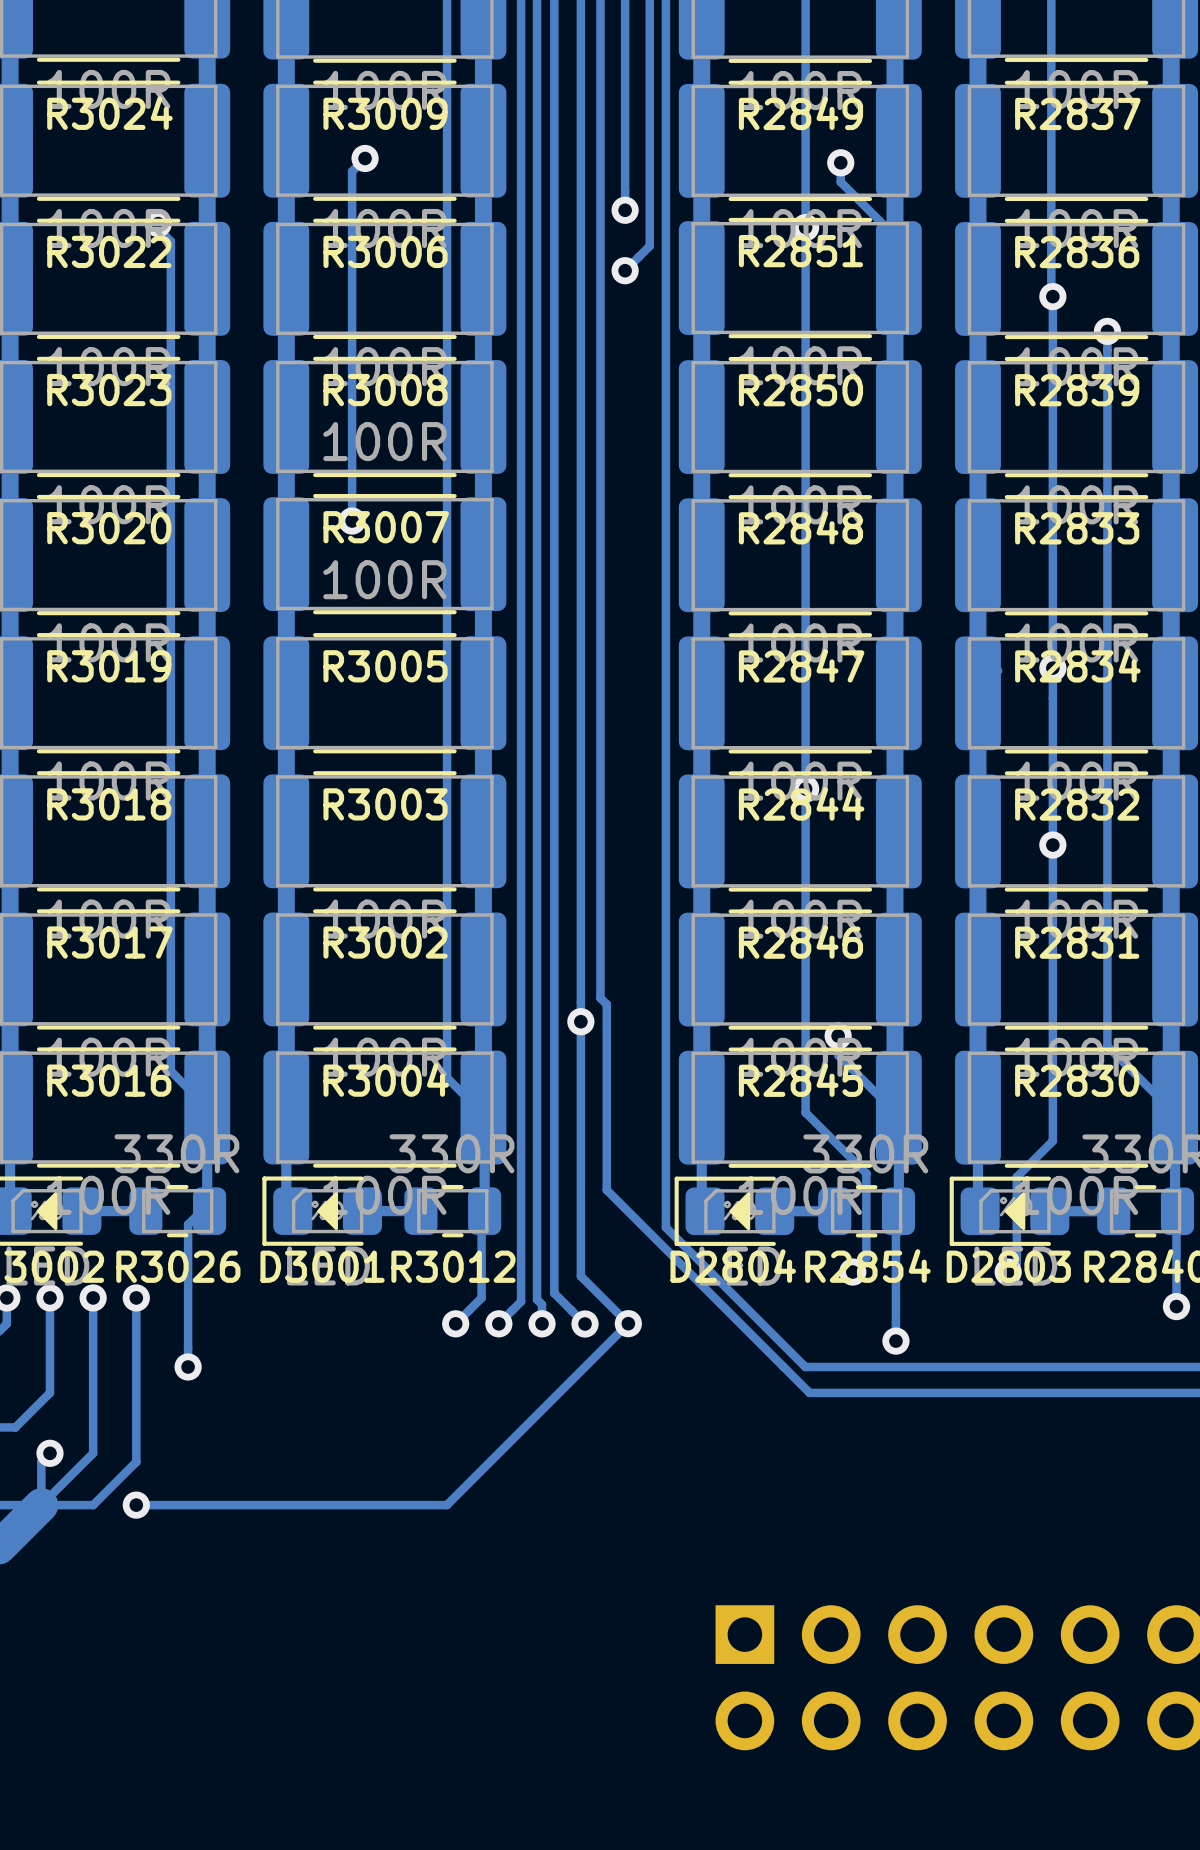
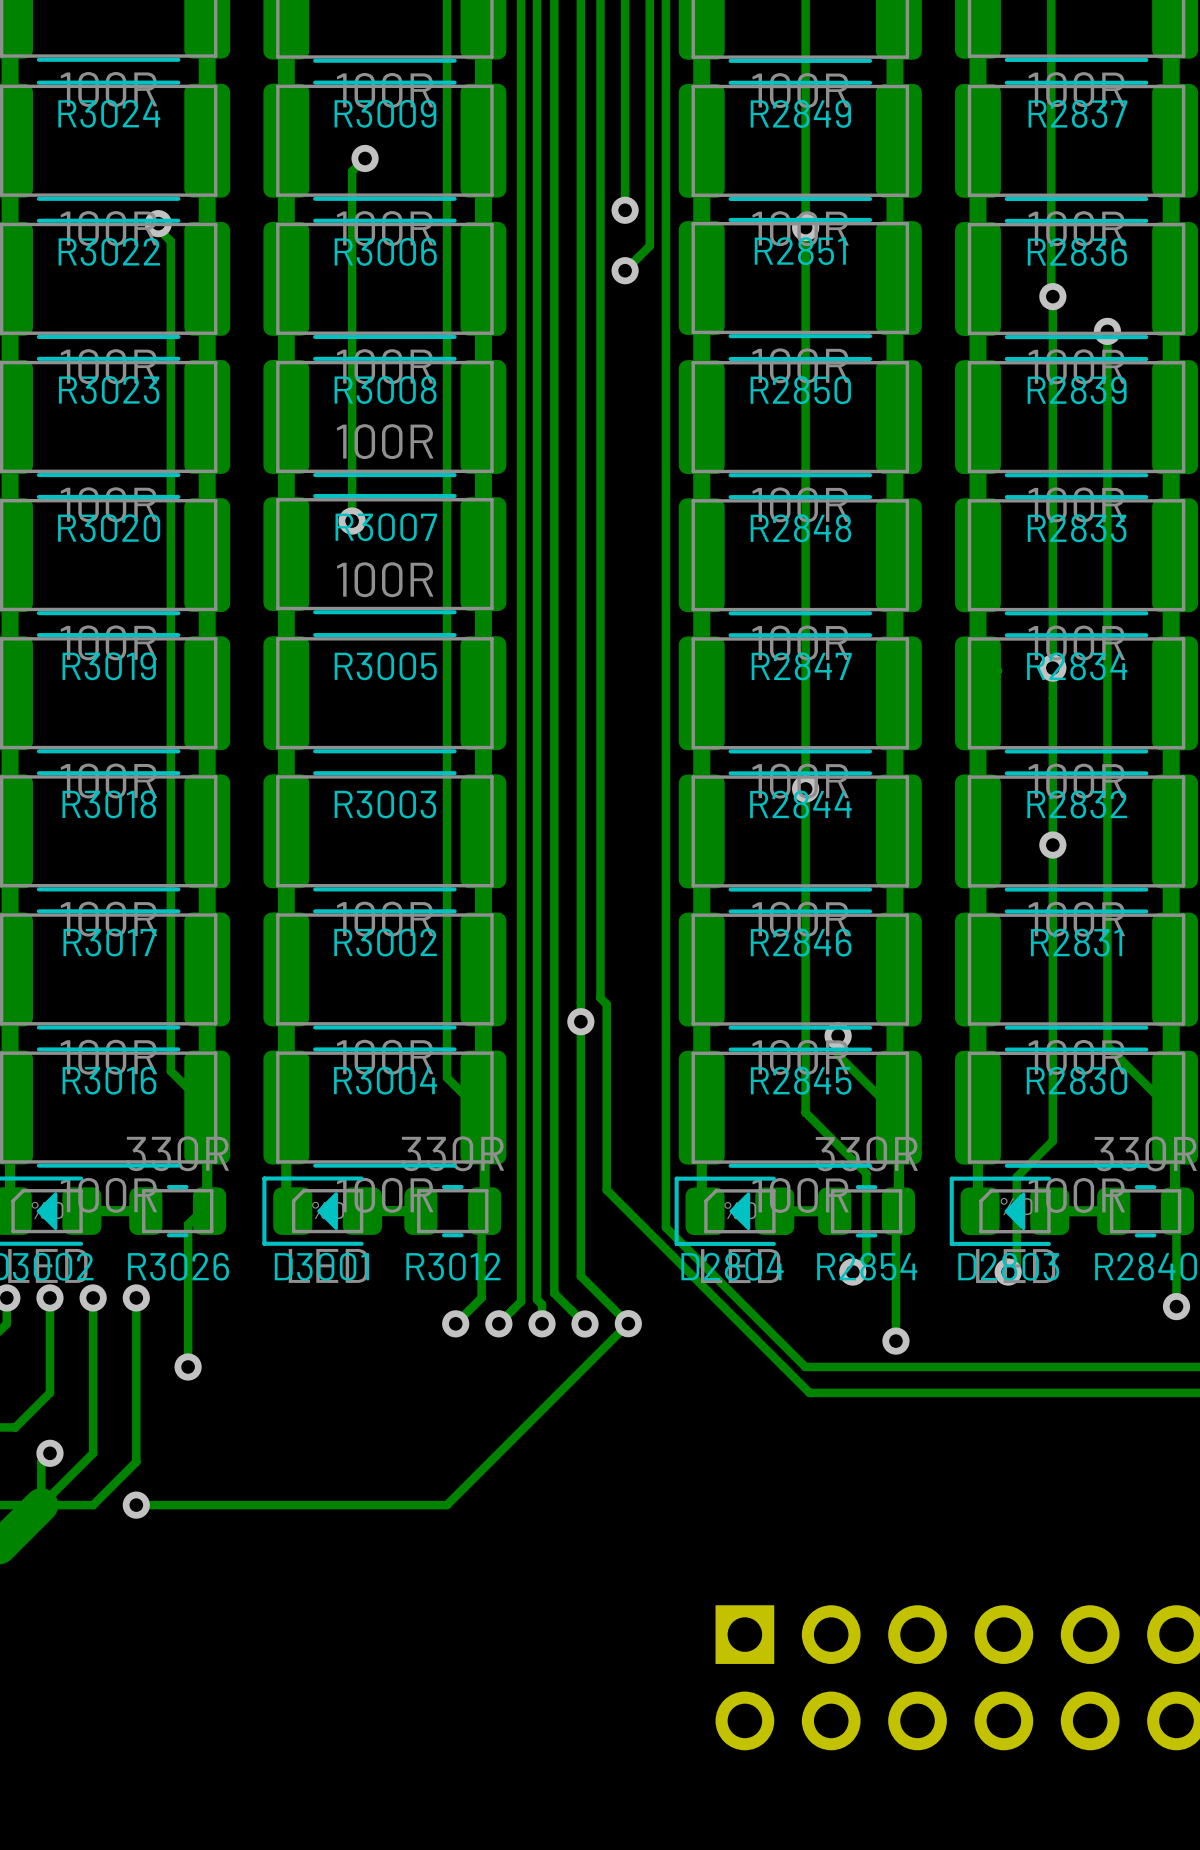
track: (840, 162) (840, 182) (896, 238) -> none
via: (840, 162) -> none

